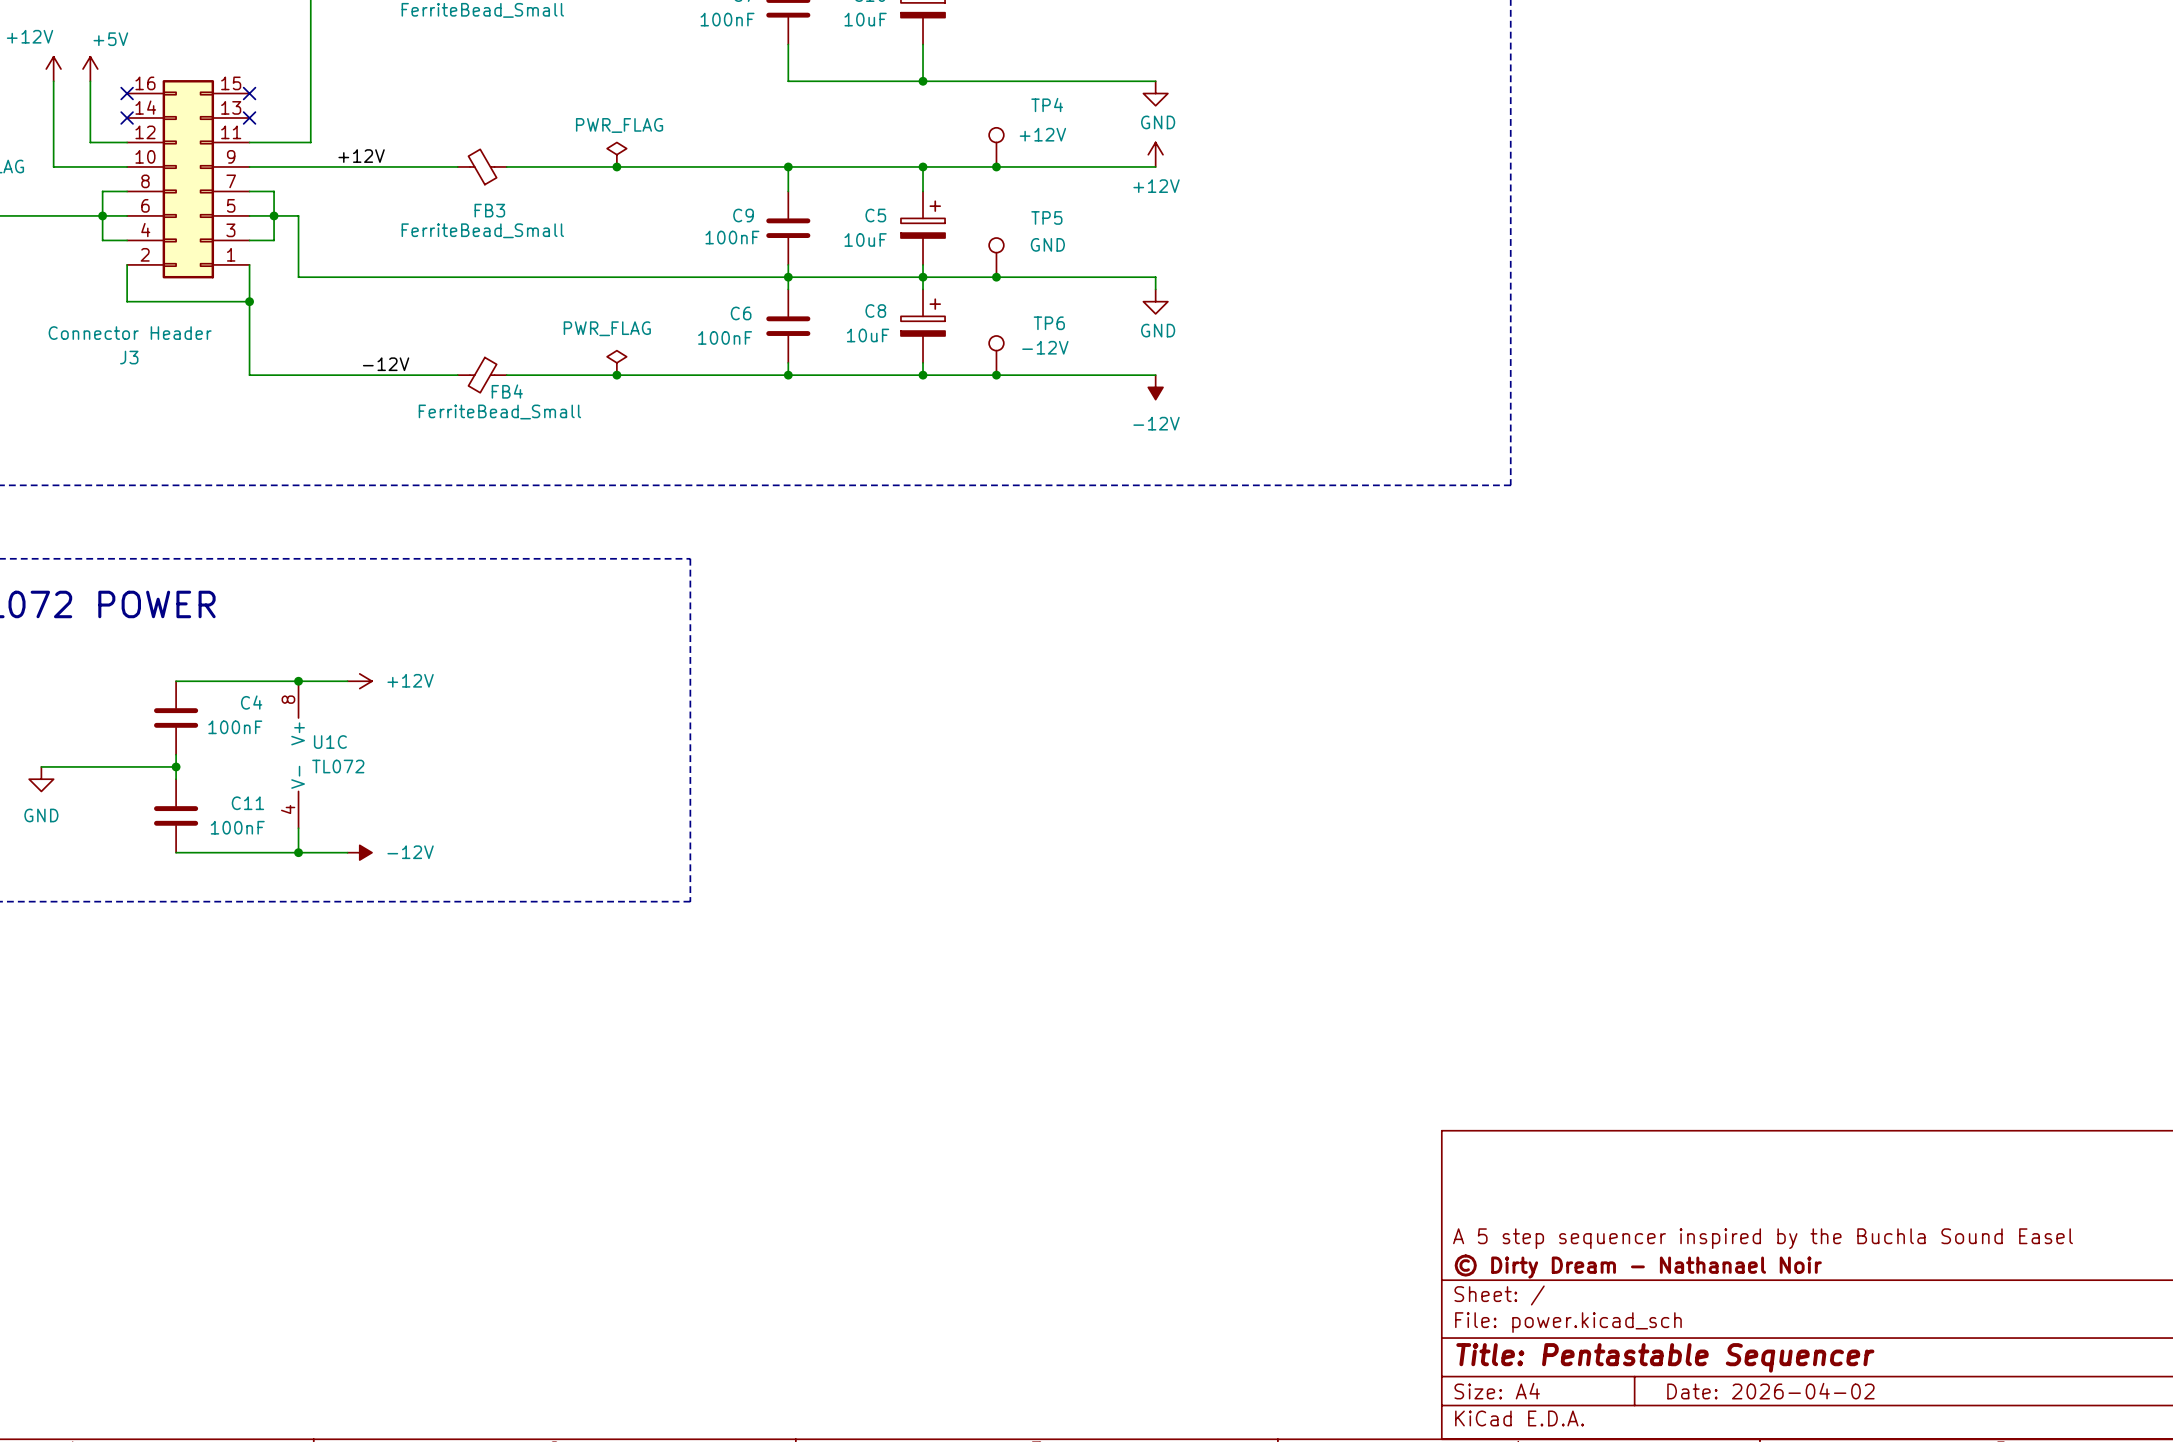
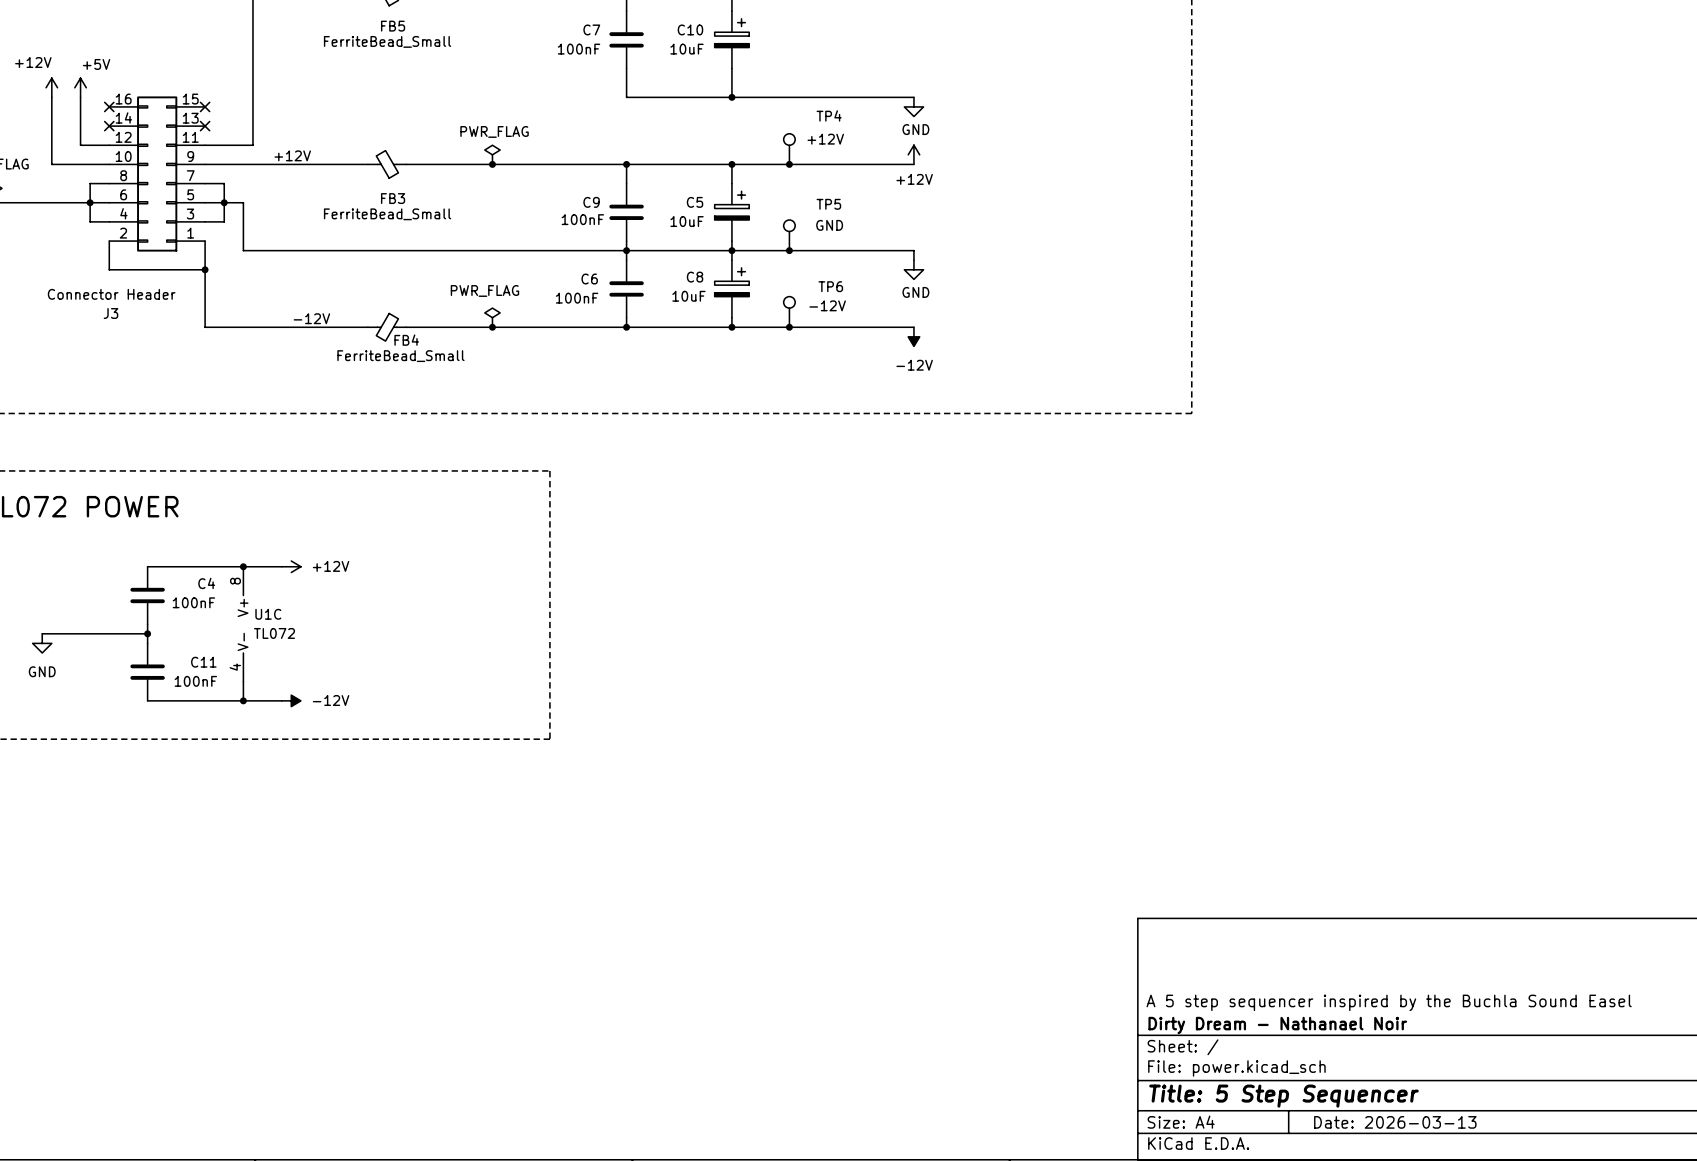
title block: © Dirty Dream - Nathanael Noir (1638, 1266) -> Dirty Dream - Nathanael Noir (1277, 1025)
title block: Title: Pentastable Sequencer (1665, 1357) -> Title: 5 Step Sequencer (1283, 1096)
title block: Date: 2026-04-02 (1770, 1391) -> Date: 2026-03-13 (1395, 1122)

